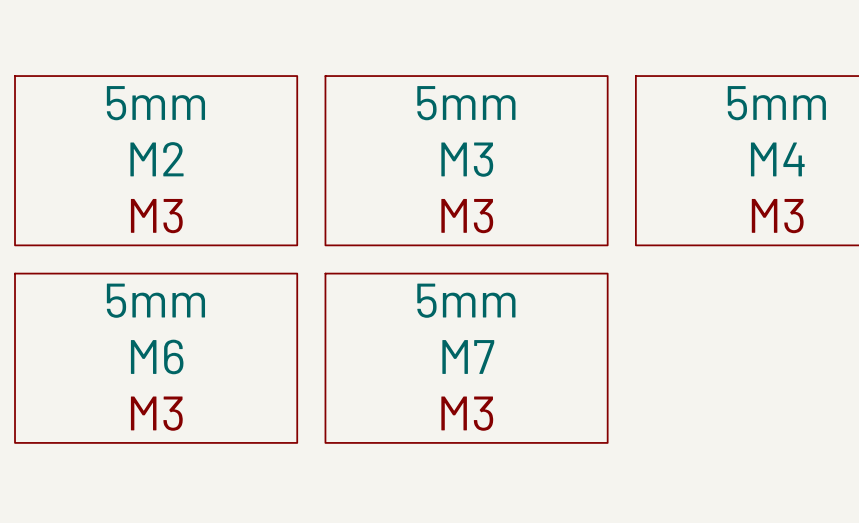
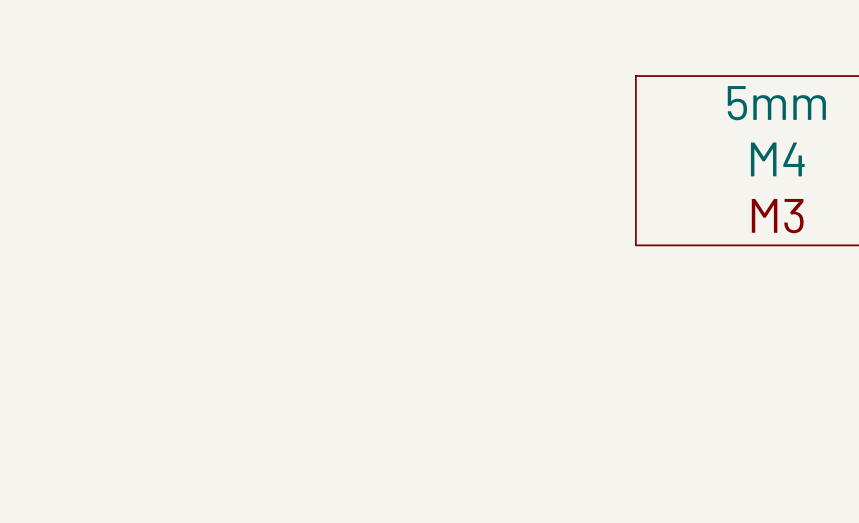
M2: 5mm (156, 160) -> none
M3: 5mm (466, 160) -> none
M6: 5mm (156, 358) -> none
M7: 5mm (466, 358) -> none

